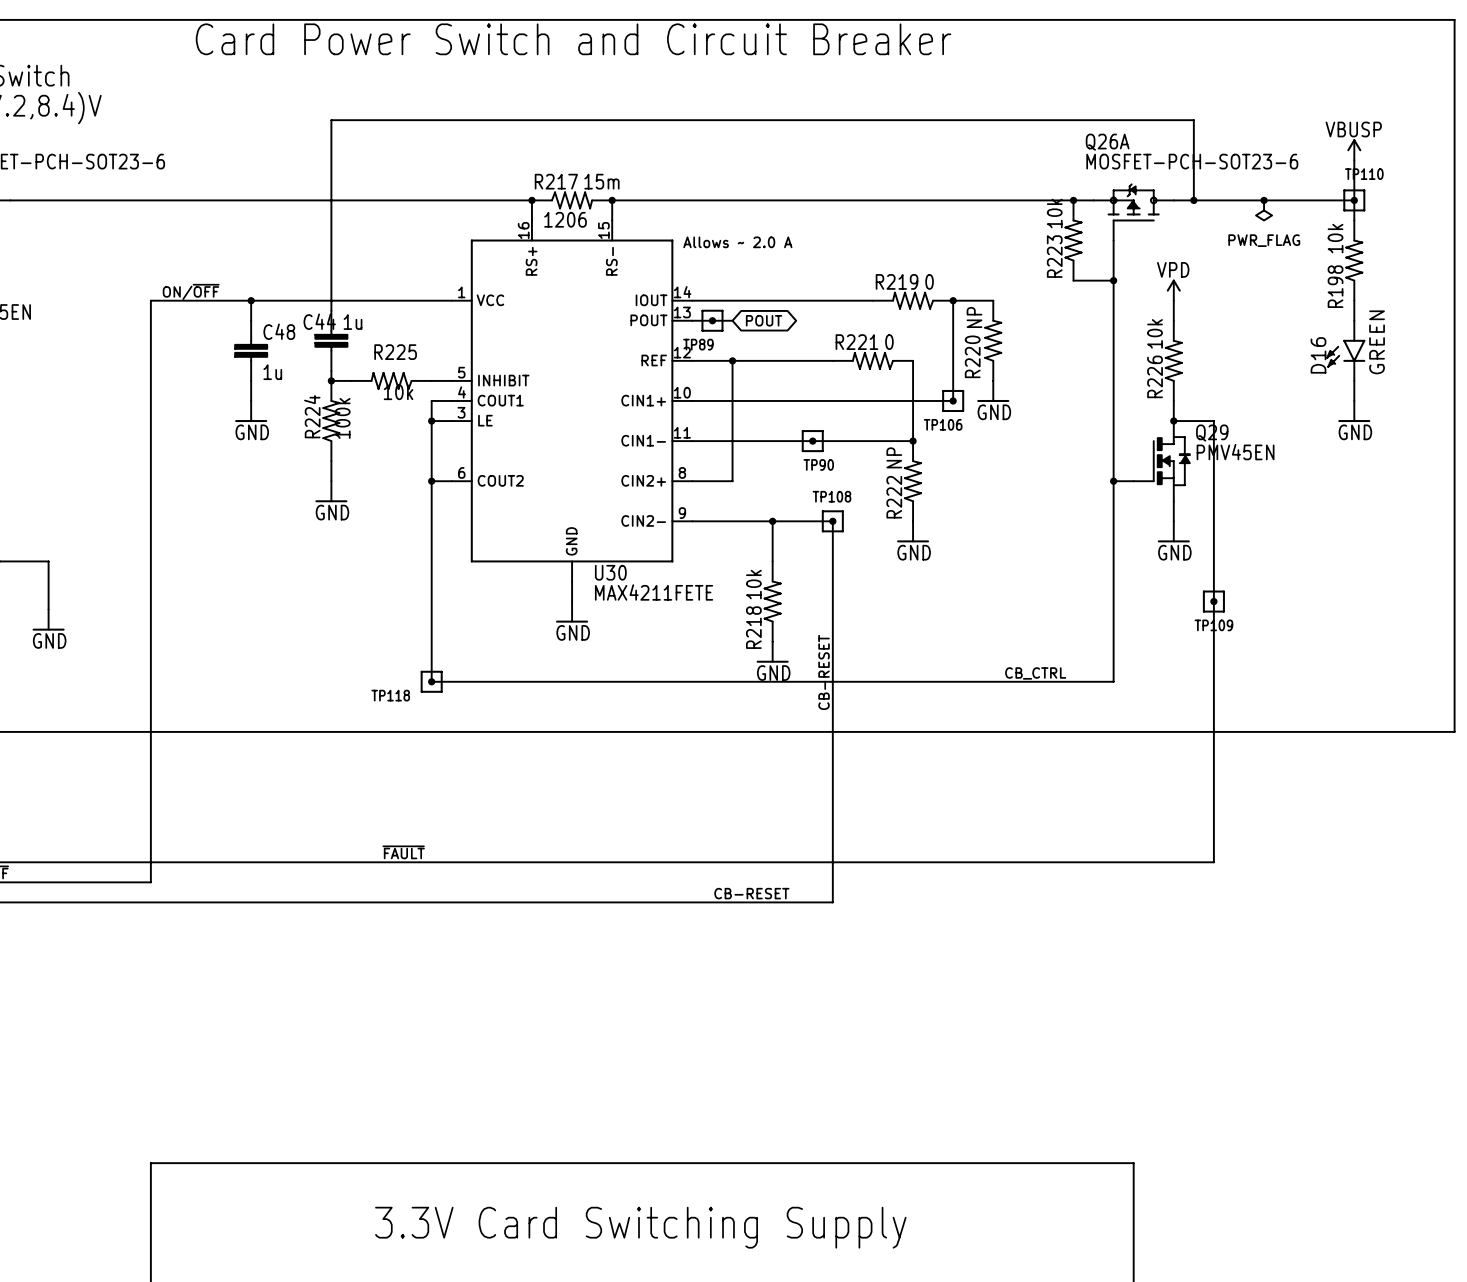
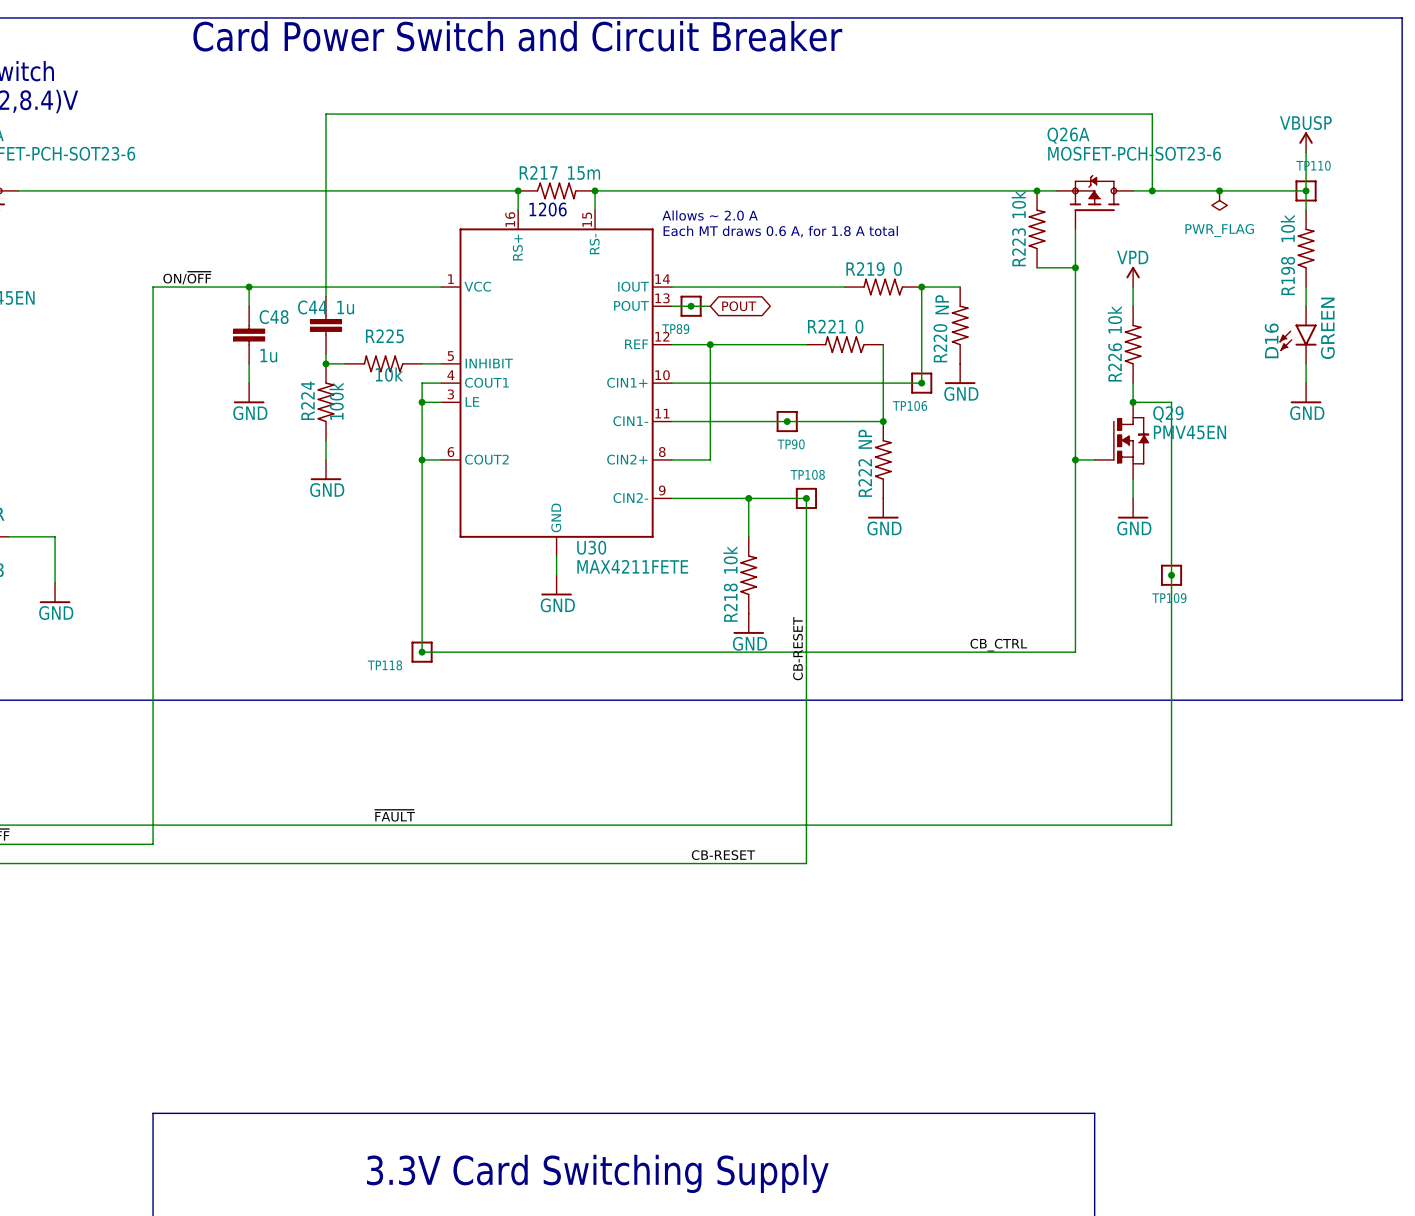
text: none -> Allows ~ 2.0 A (710, 215)
text: Allows ~ 2.0 A (737, 242) -> Each MT draws 0.6 A, for 1.8 A total (780, 231)

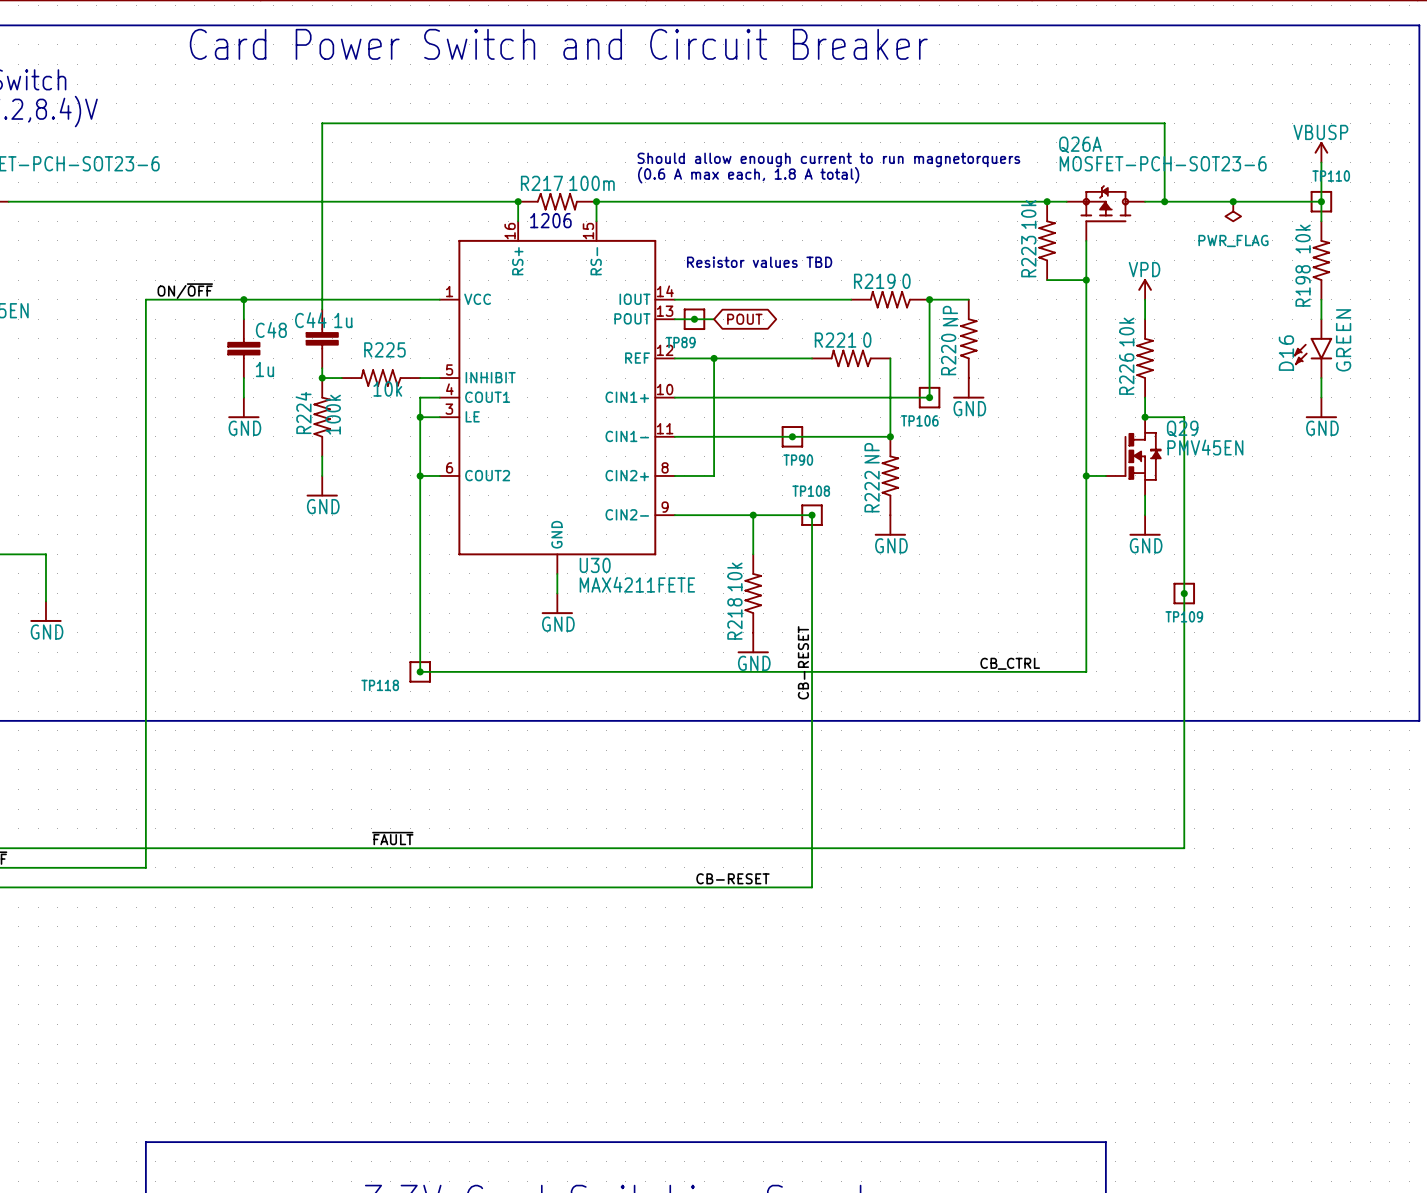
text: none -> Should allow enough current to run magnetorquers (828, 159)
text: none -> (0.6 A max each, 1.8 A total) (748, 175)
R217 value: 15m (584, 173) -> 100m (592, 183)
text: Allows ~ 2.0 A (710, 215) -> none
text: Each MT draws 0.6 A, for 1.8 A total (780, 231) -> none
text: none -> Resistor values TBD (759, 262)

